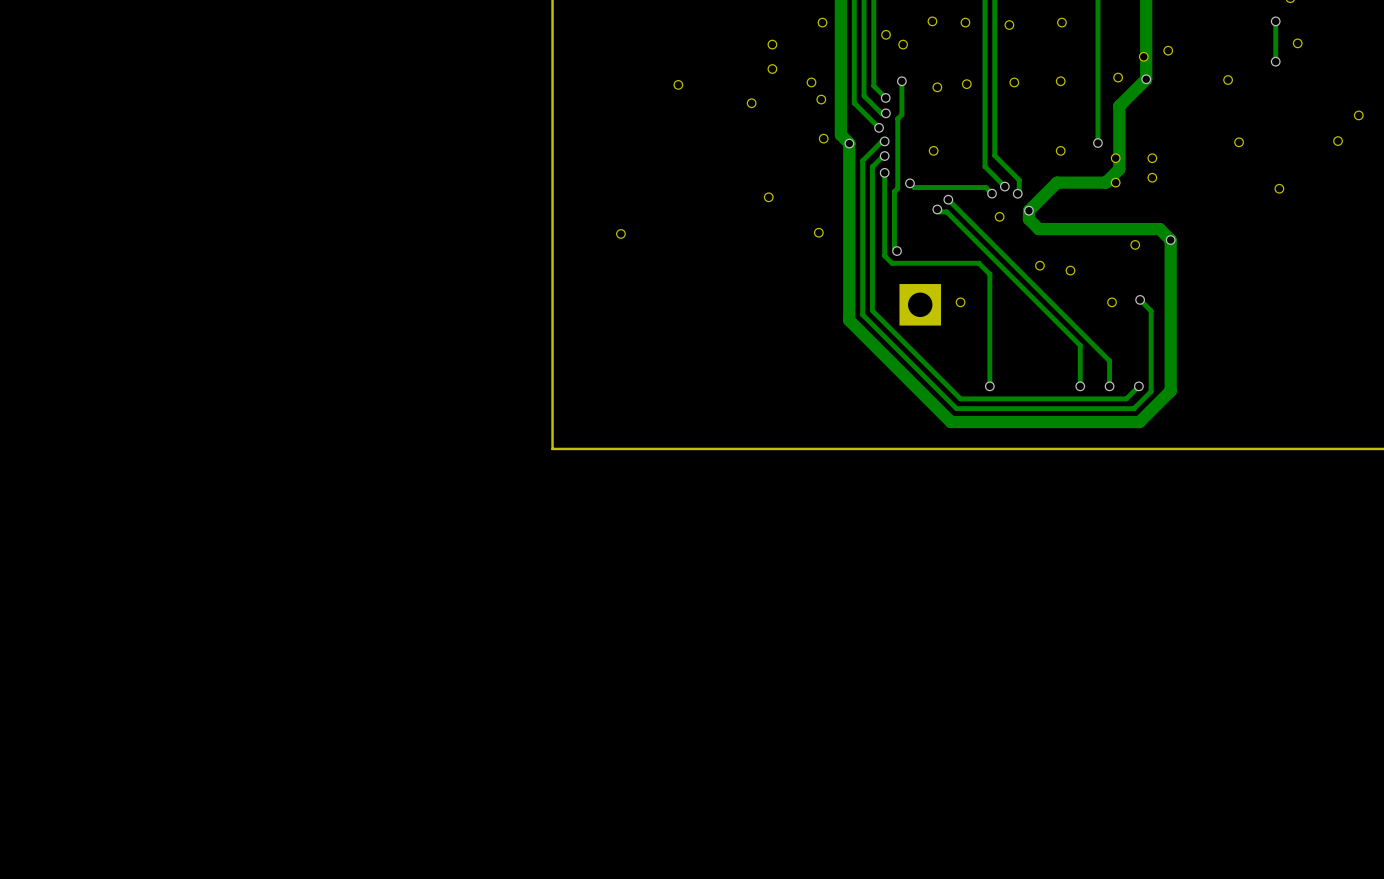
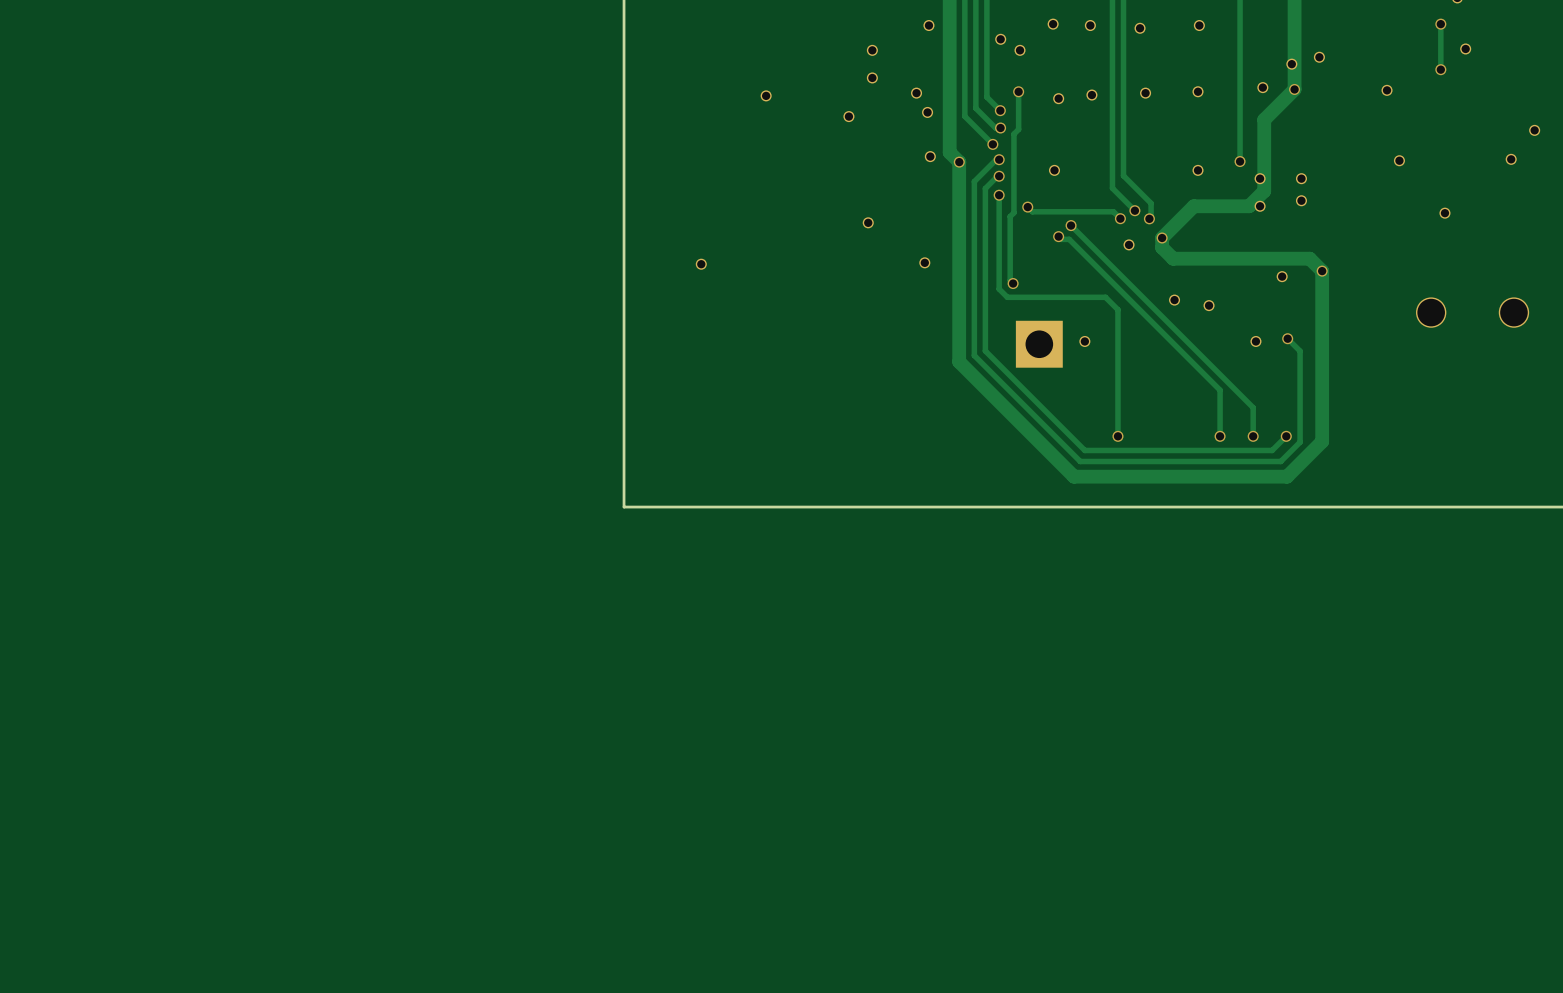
part: none -> (1472, 312)

